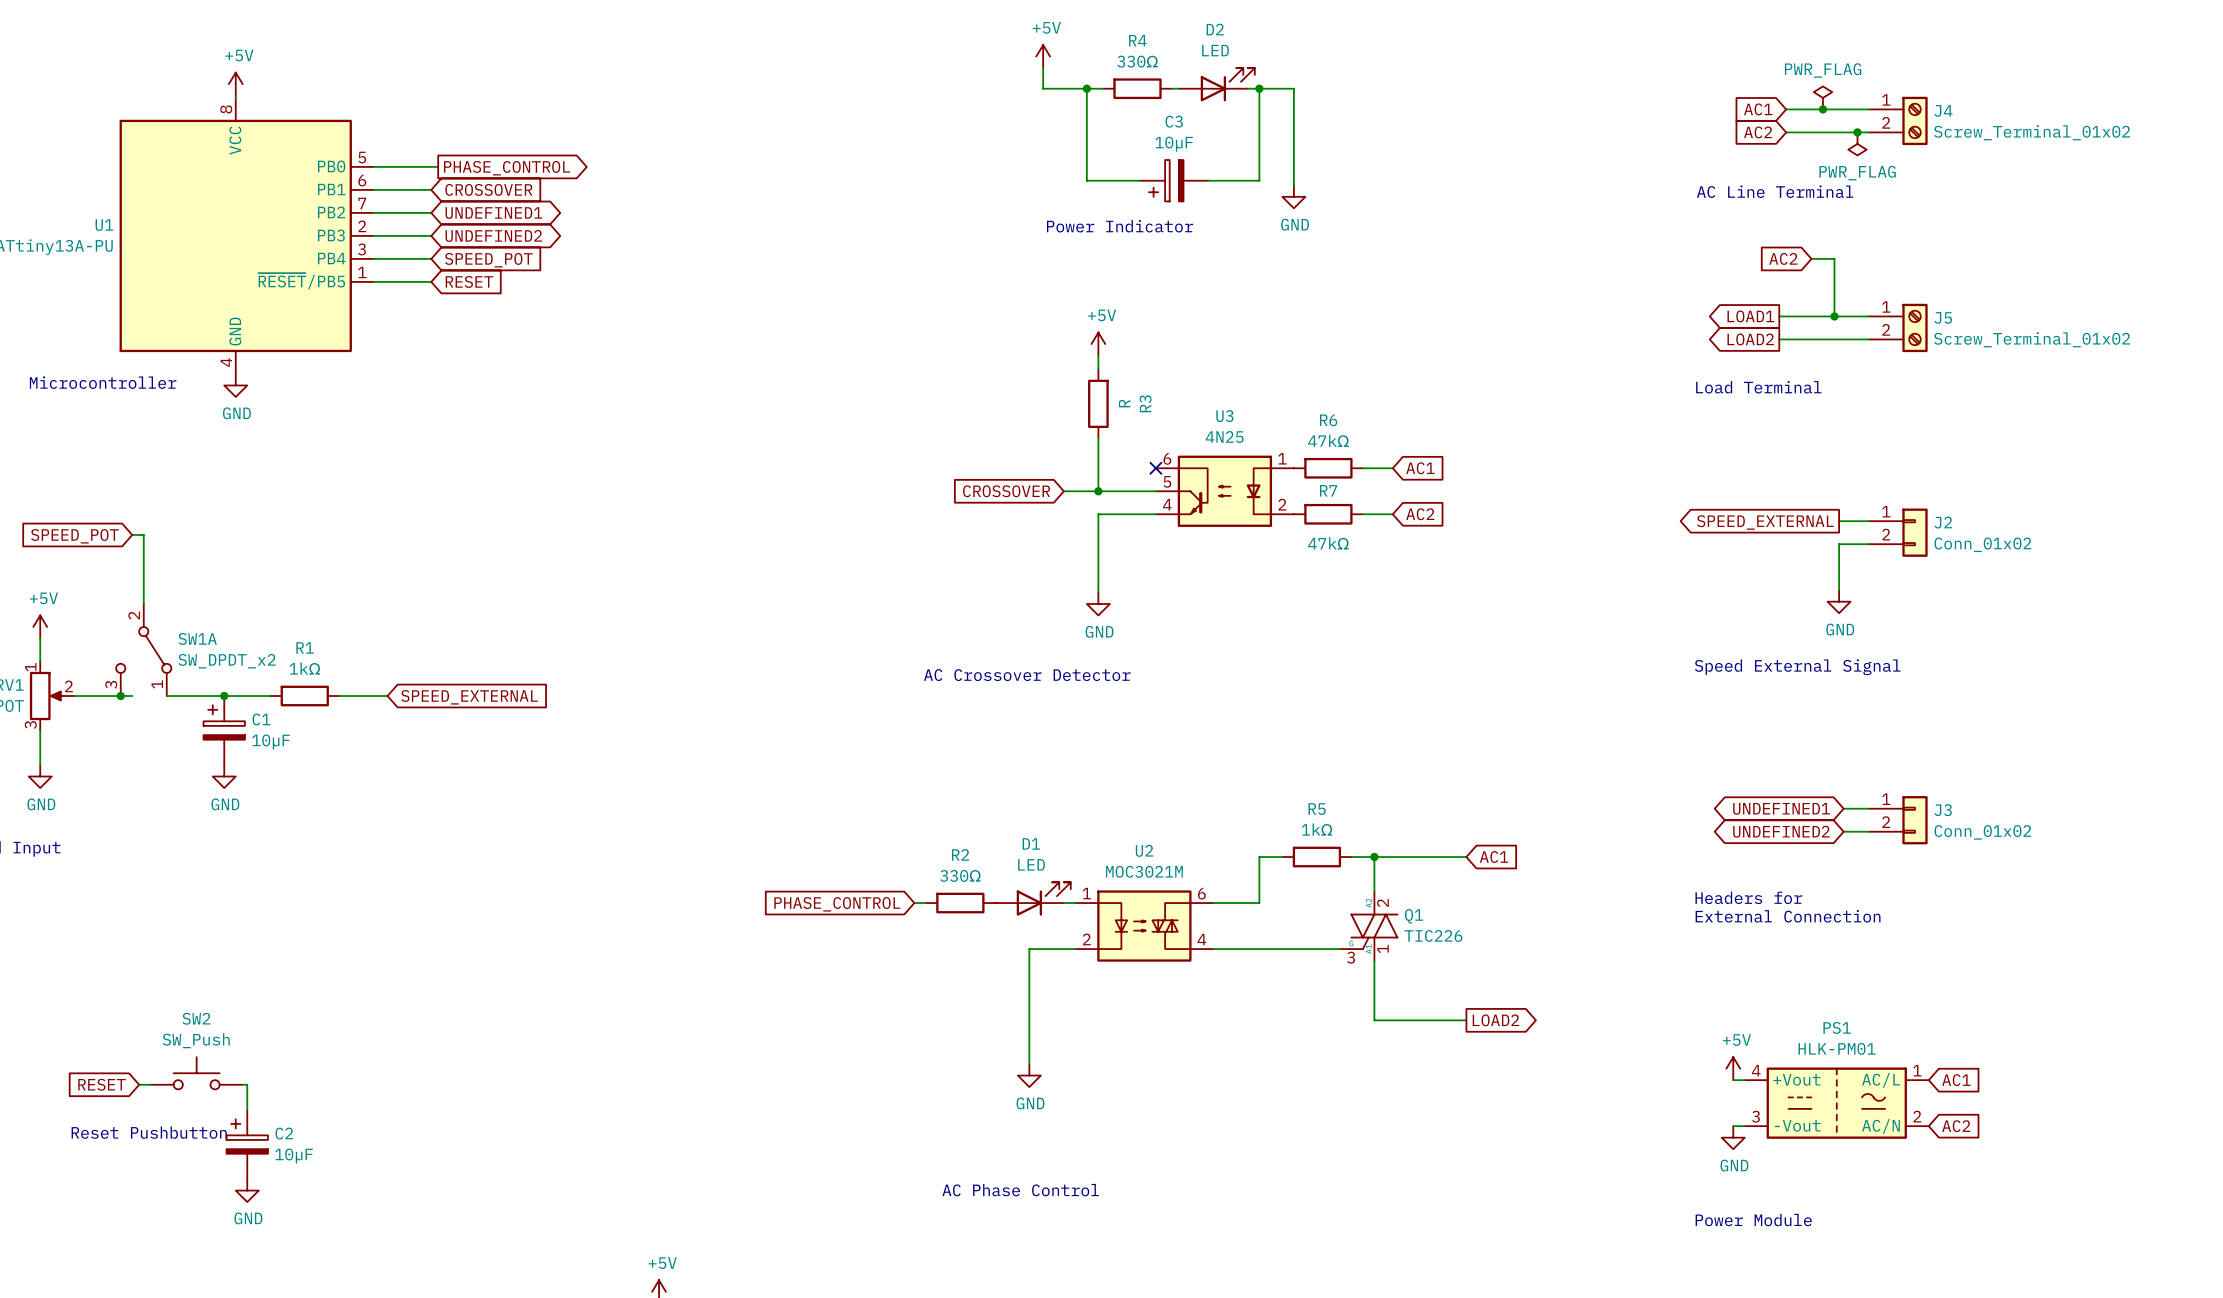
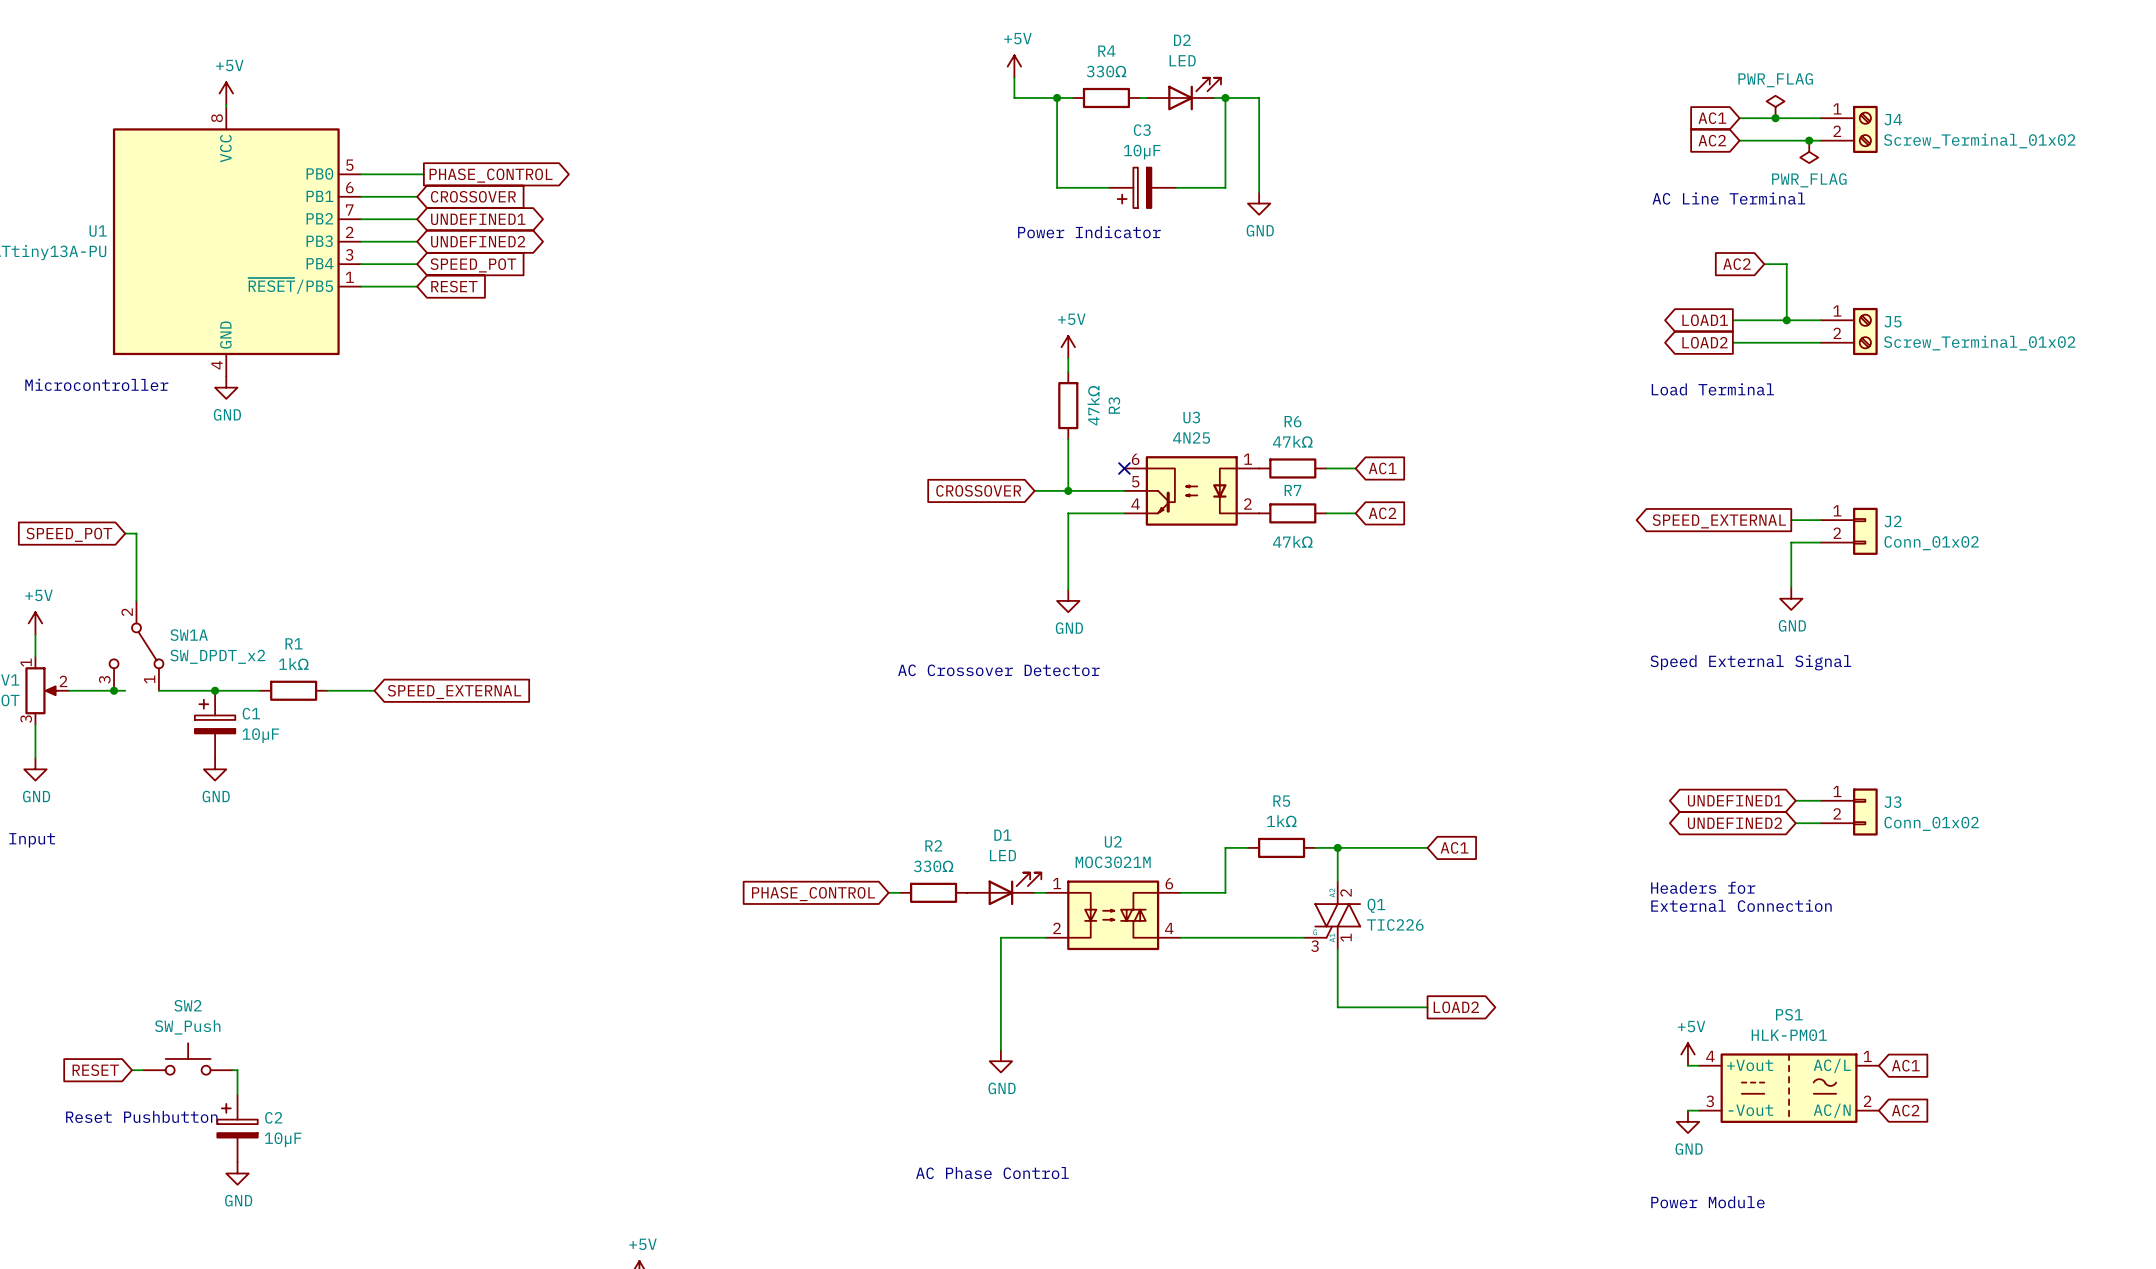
R3 value: R (1124, 403) -> 47kΩ (1093, 405)

